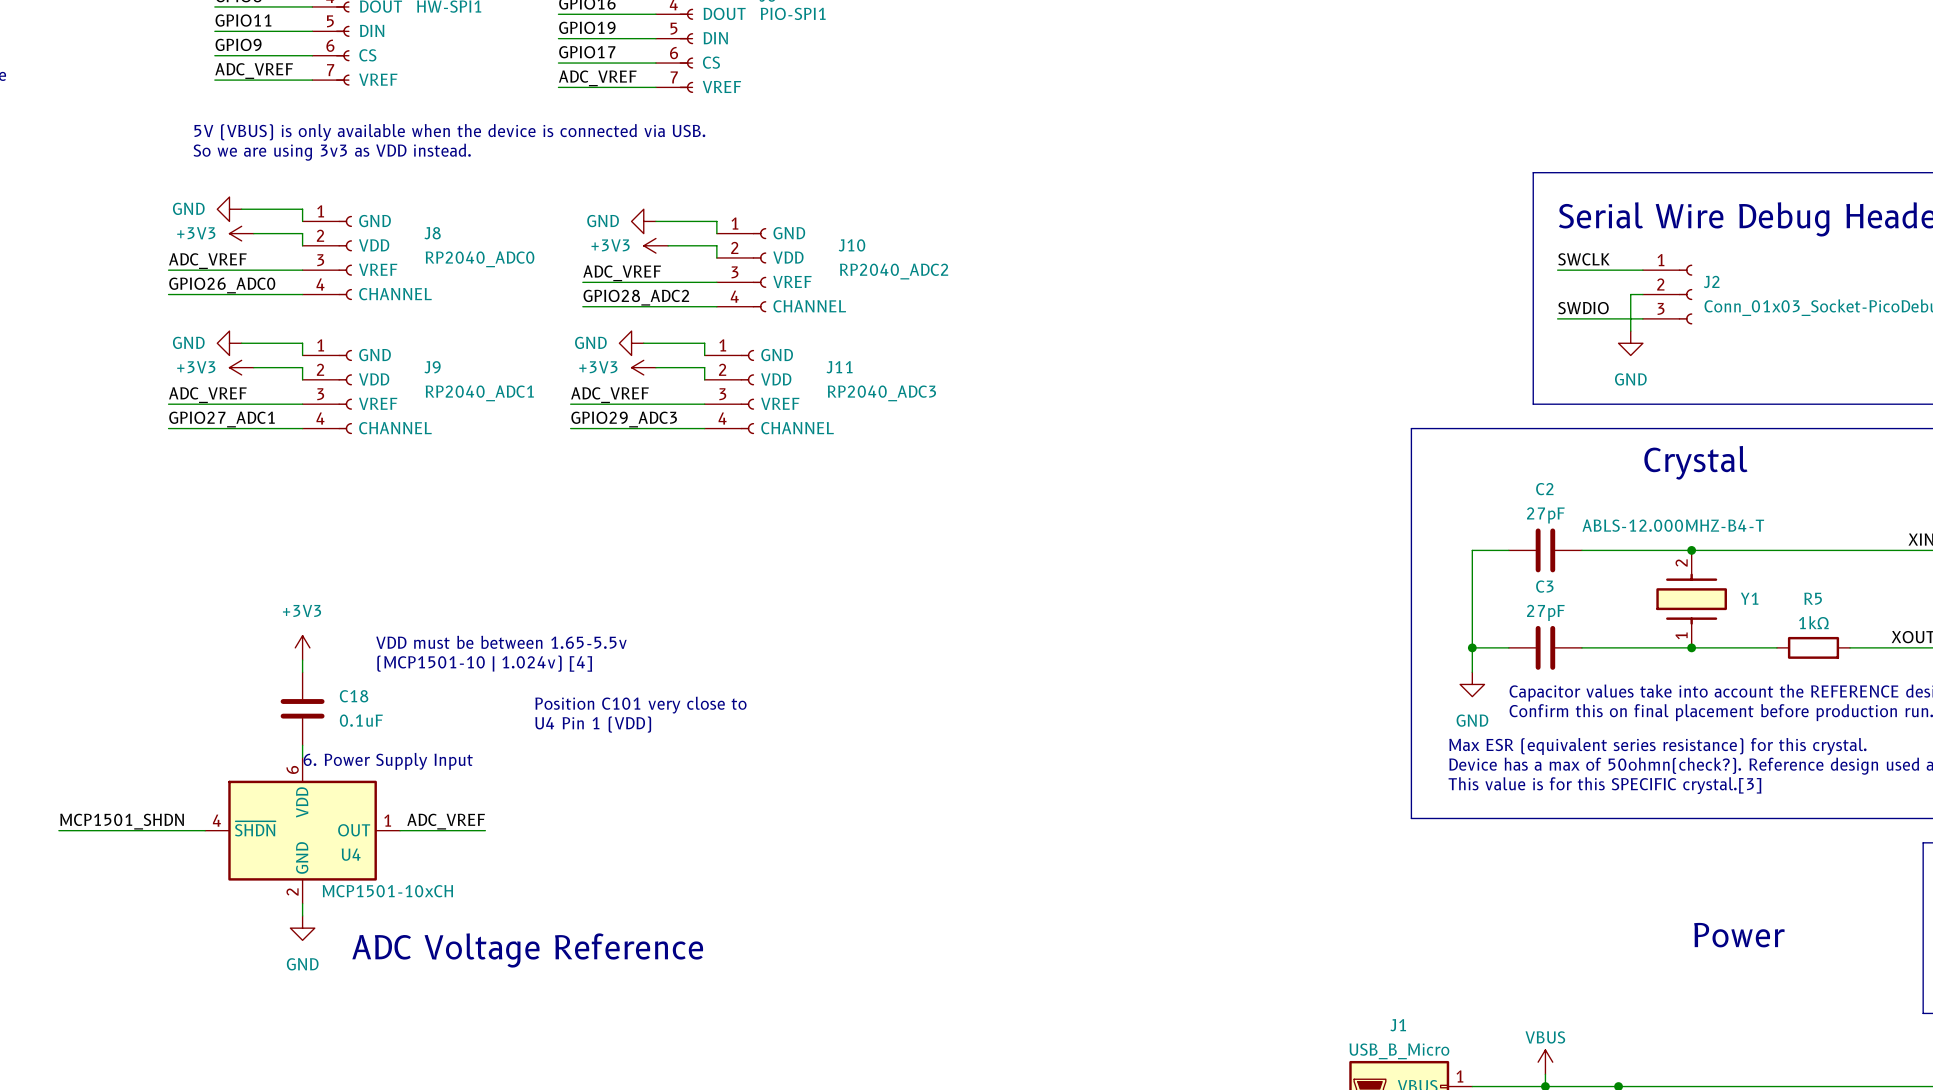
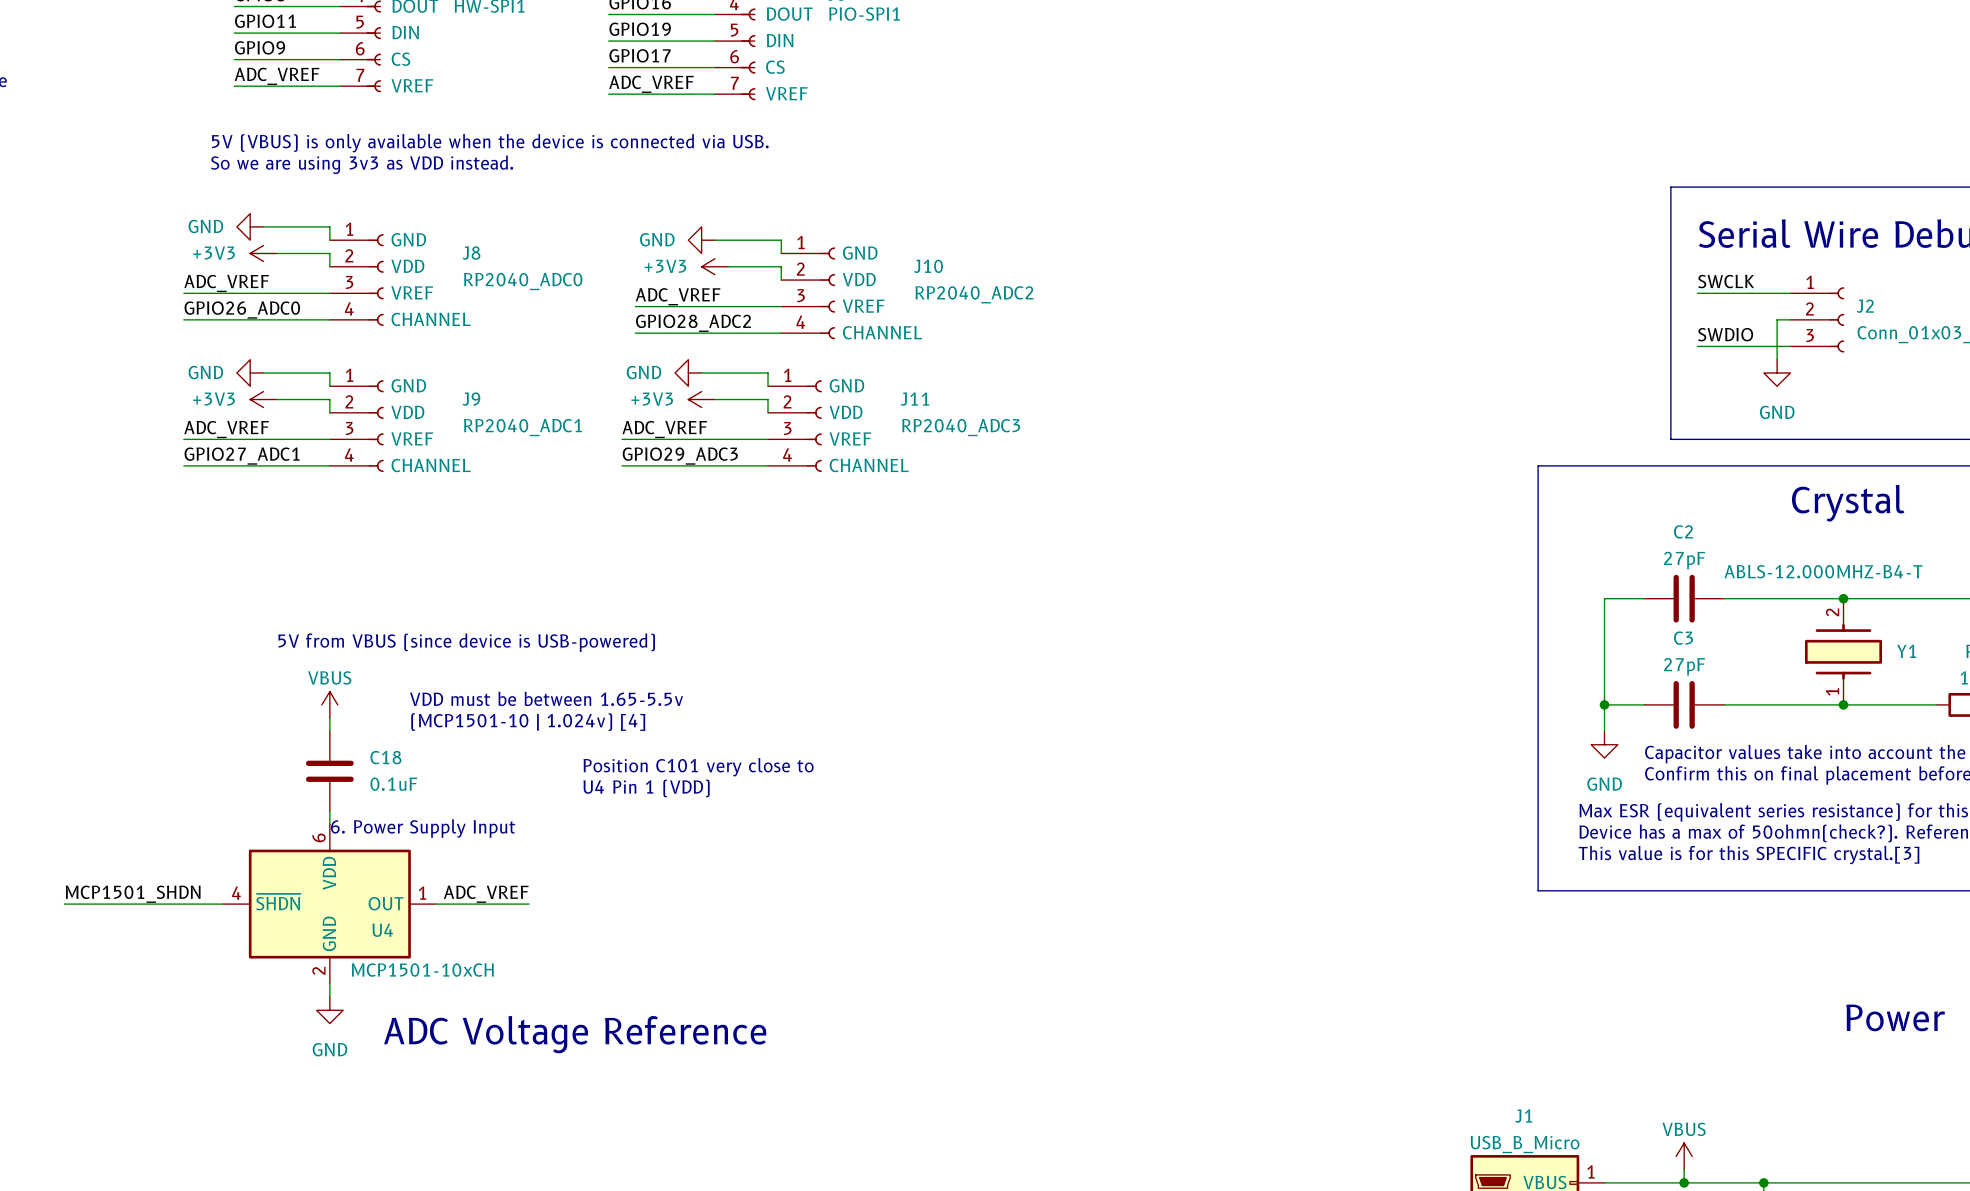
text: none -> 5V from VBUS (since device is USB-powered) (466, 642)
power symbol: +3V3 (302, 647) -> VBUS (329, 704)

